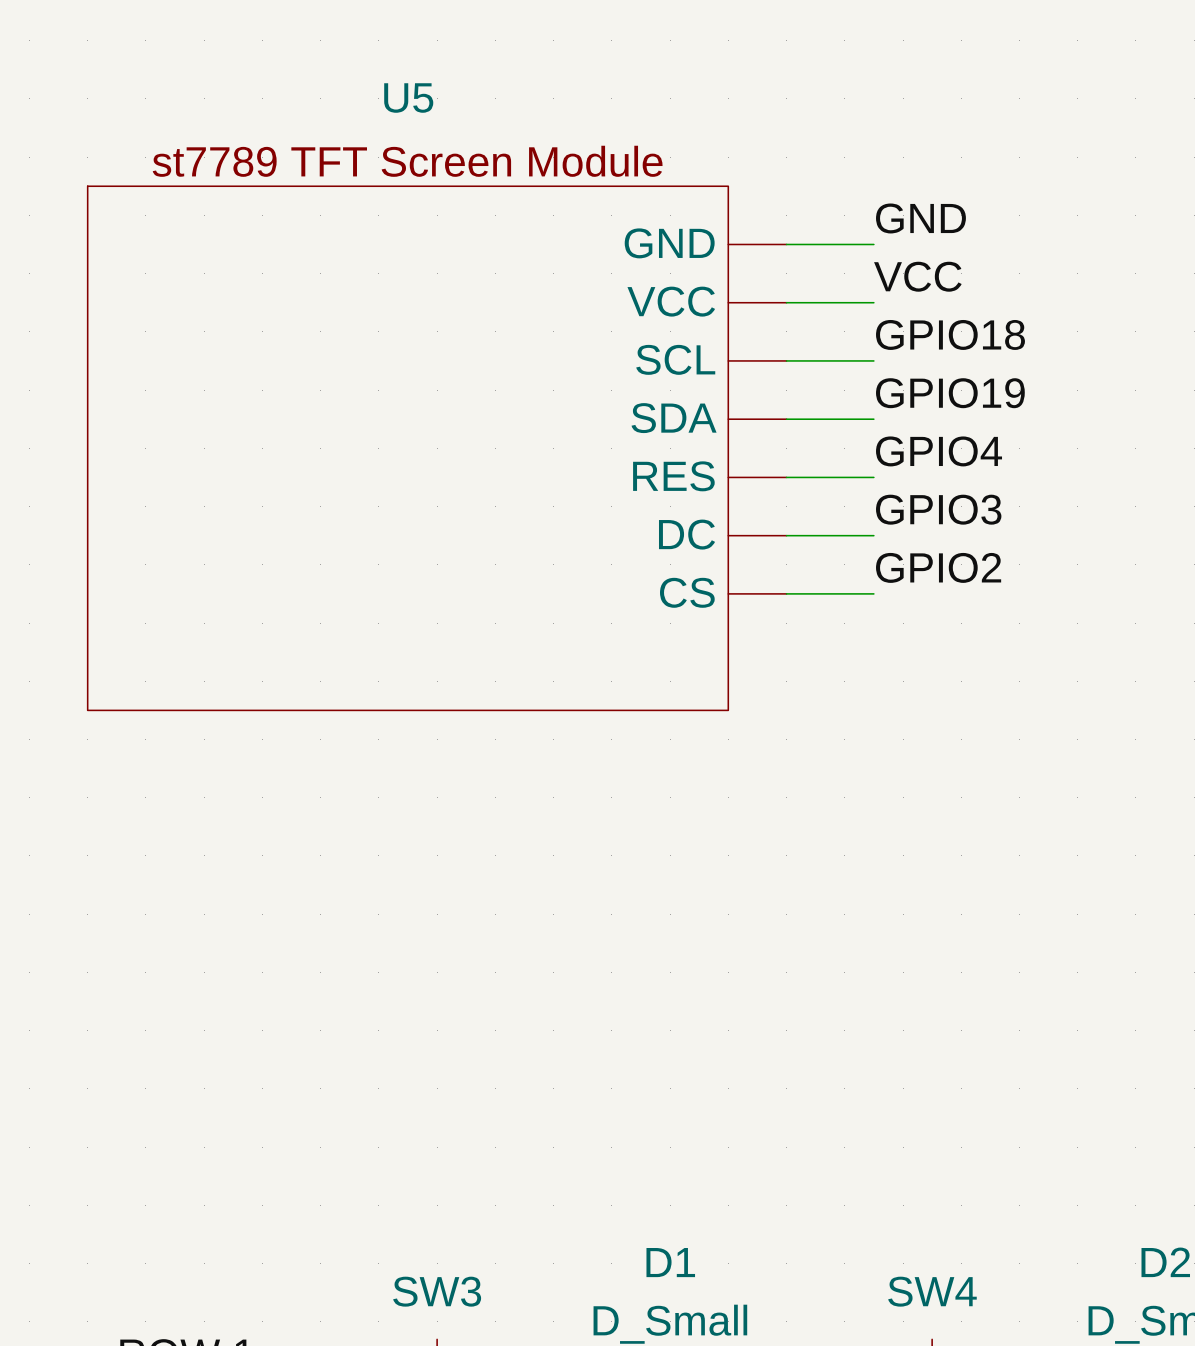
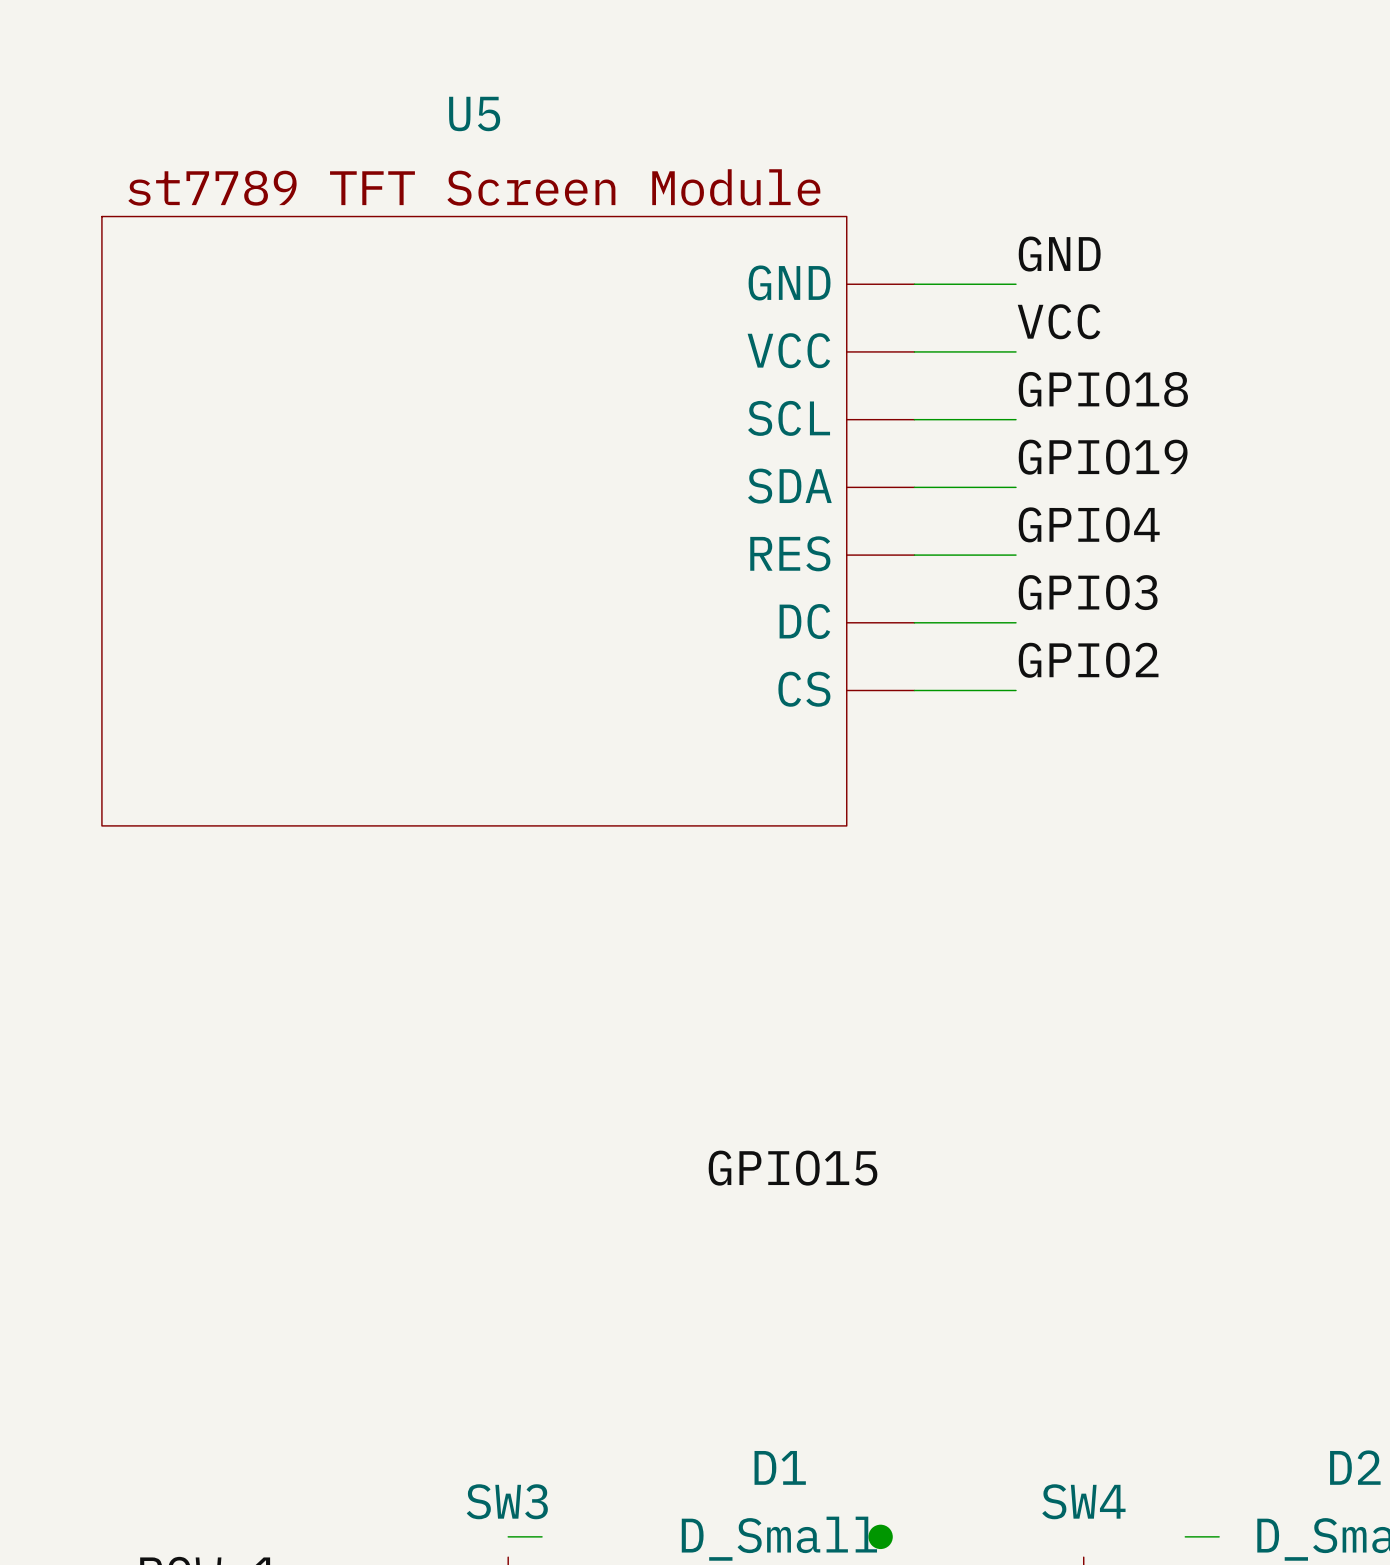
label: none -> GPIO15 (793, 1168)
wire: none -> (508, 1536) (542, 1536)
junction: none -> (880, 1536)
wire: none -> (1185, 1536) (1219, 1536)

